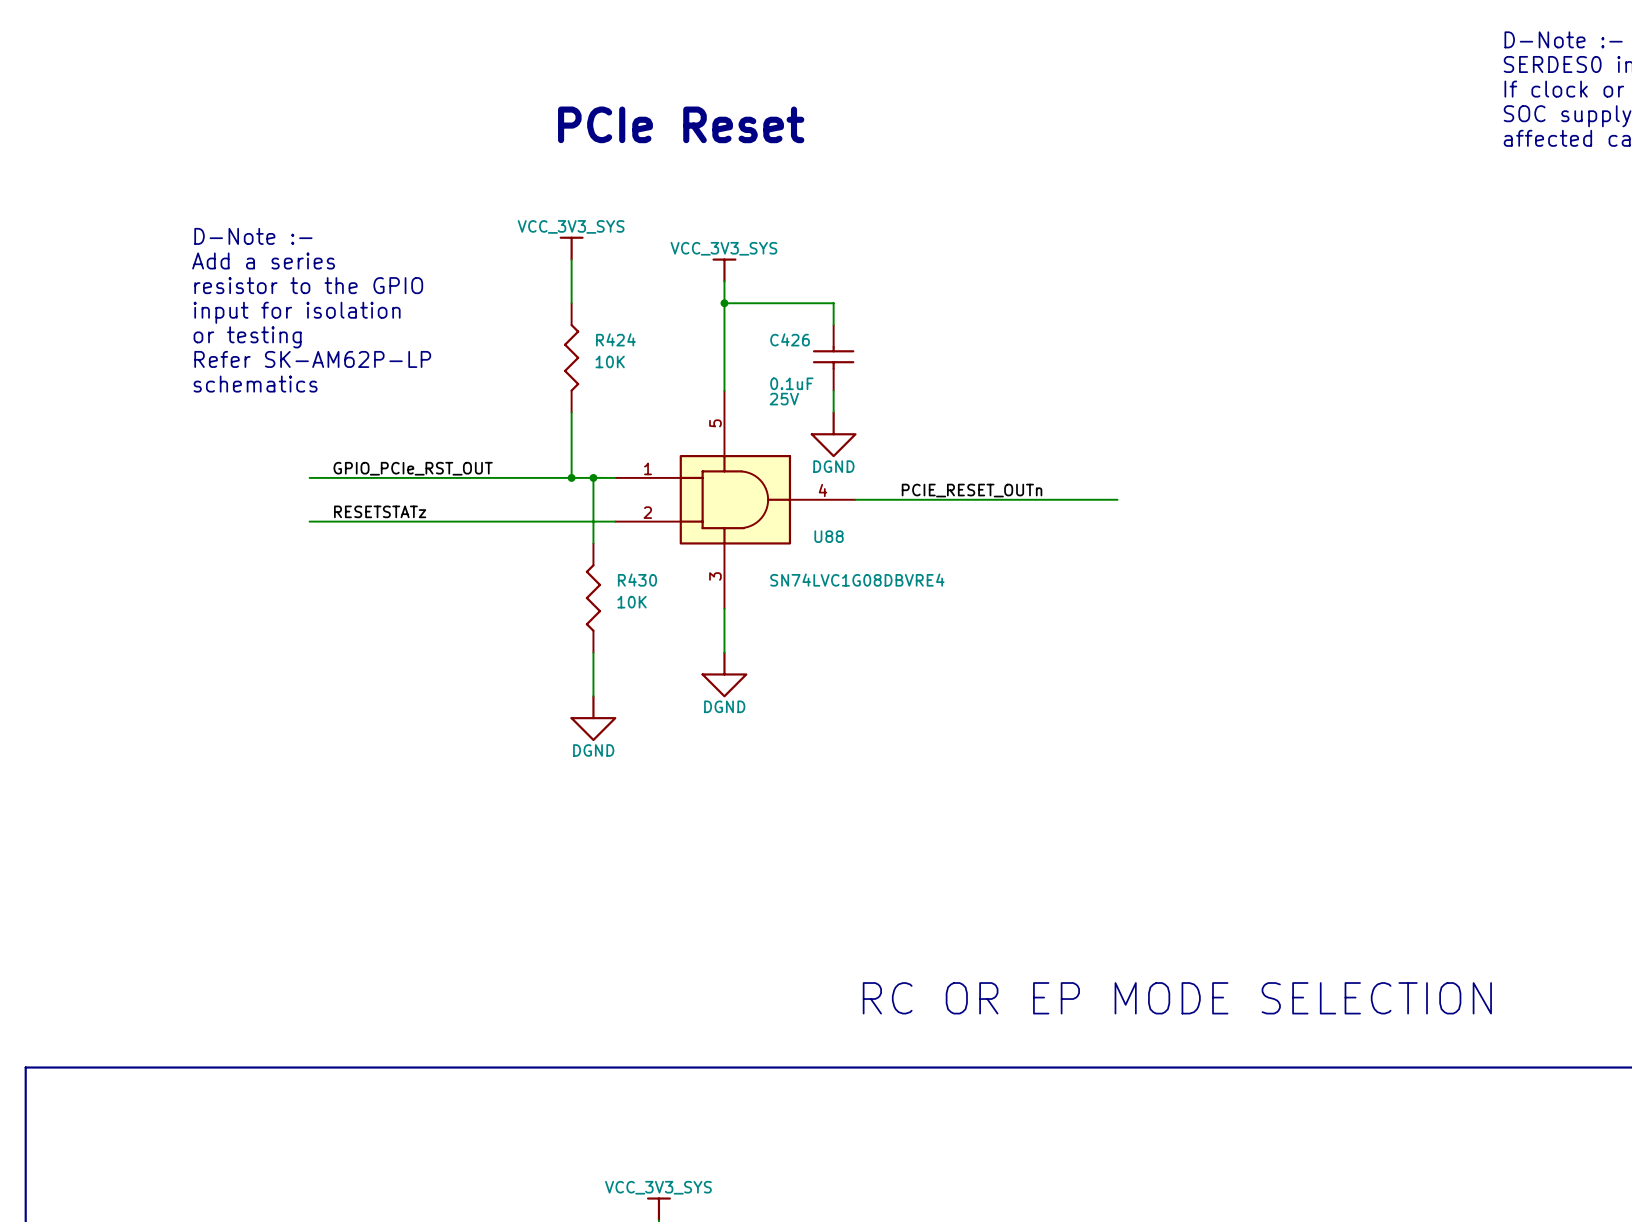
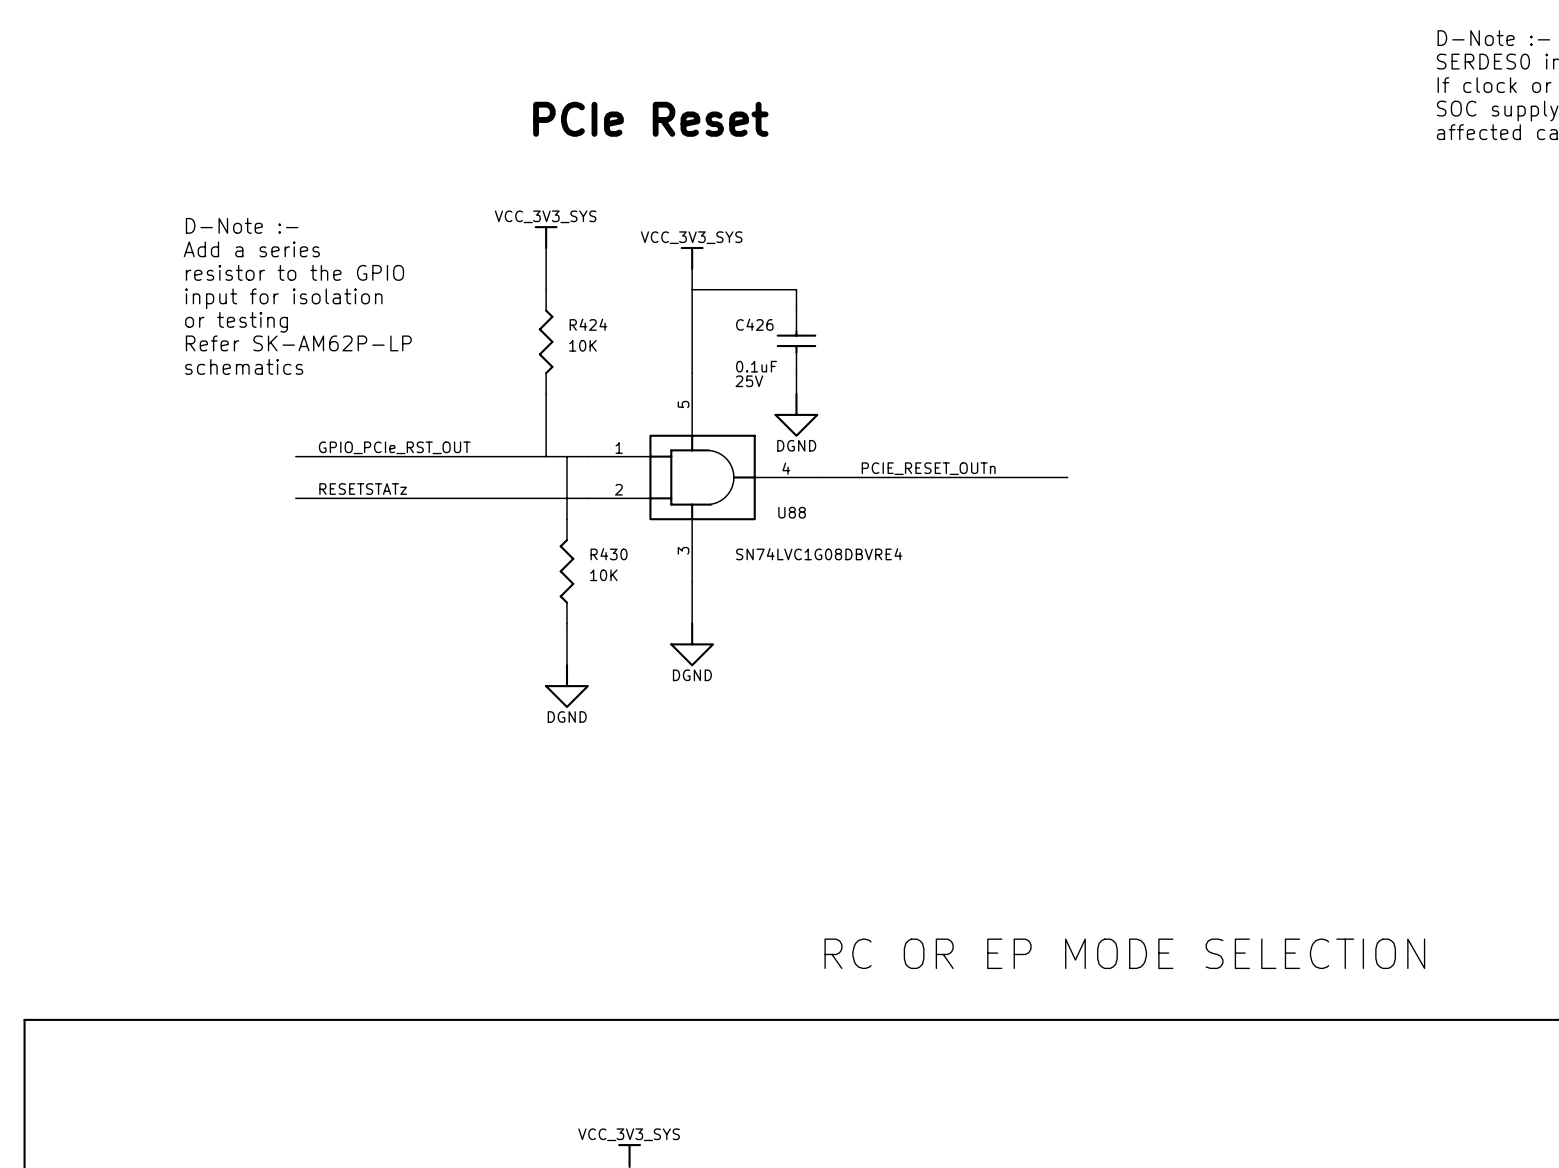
junction: (724, 303) -> none
junction: (571, 477) -> none
junction: (593, 477) -> none

